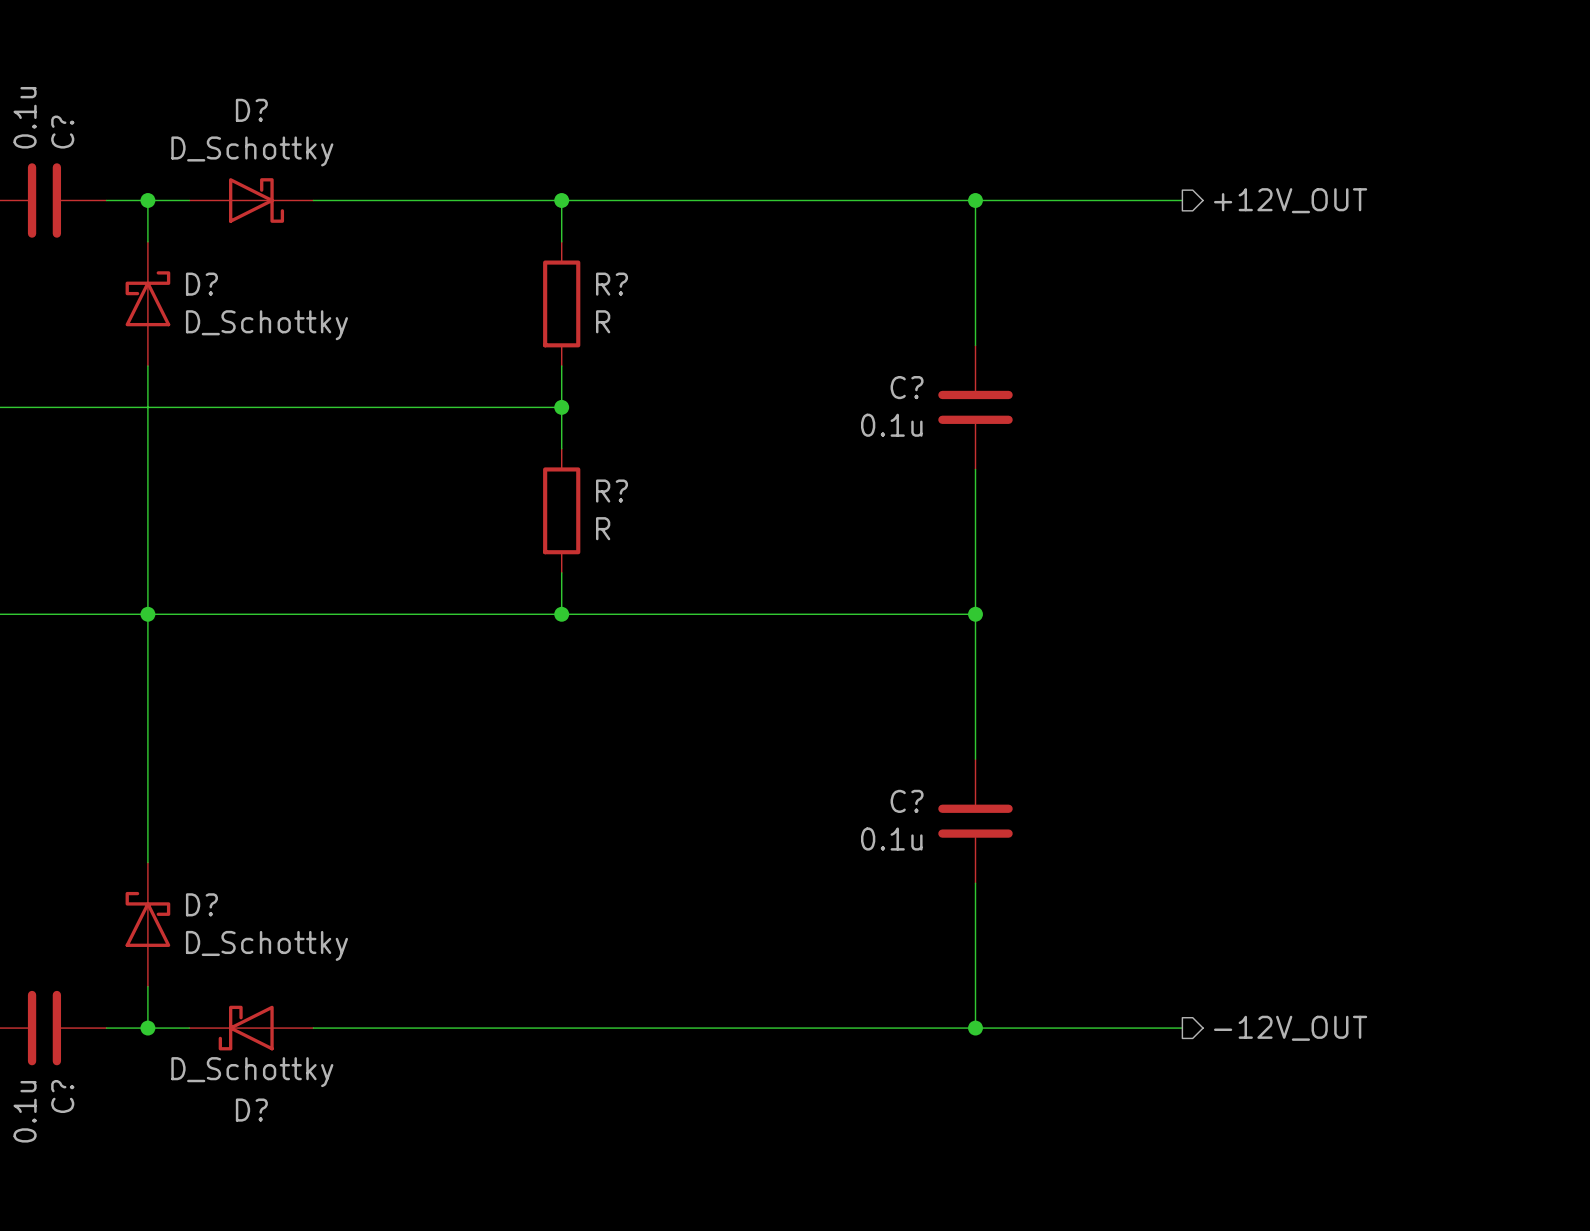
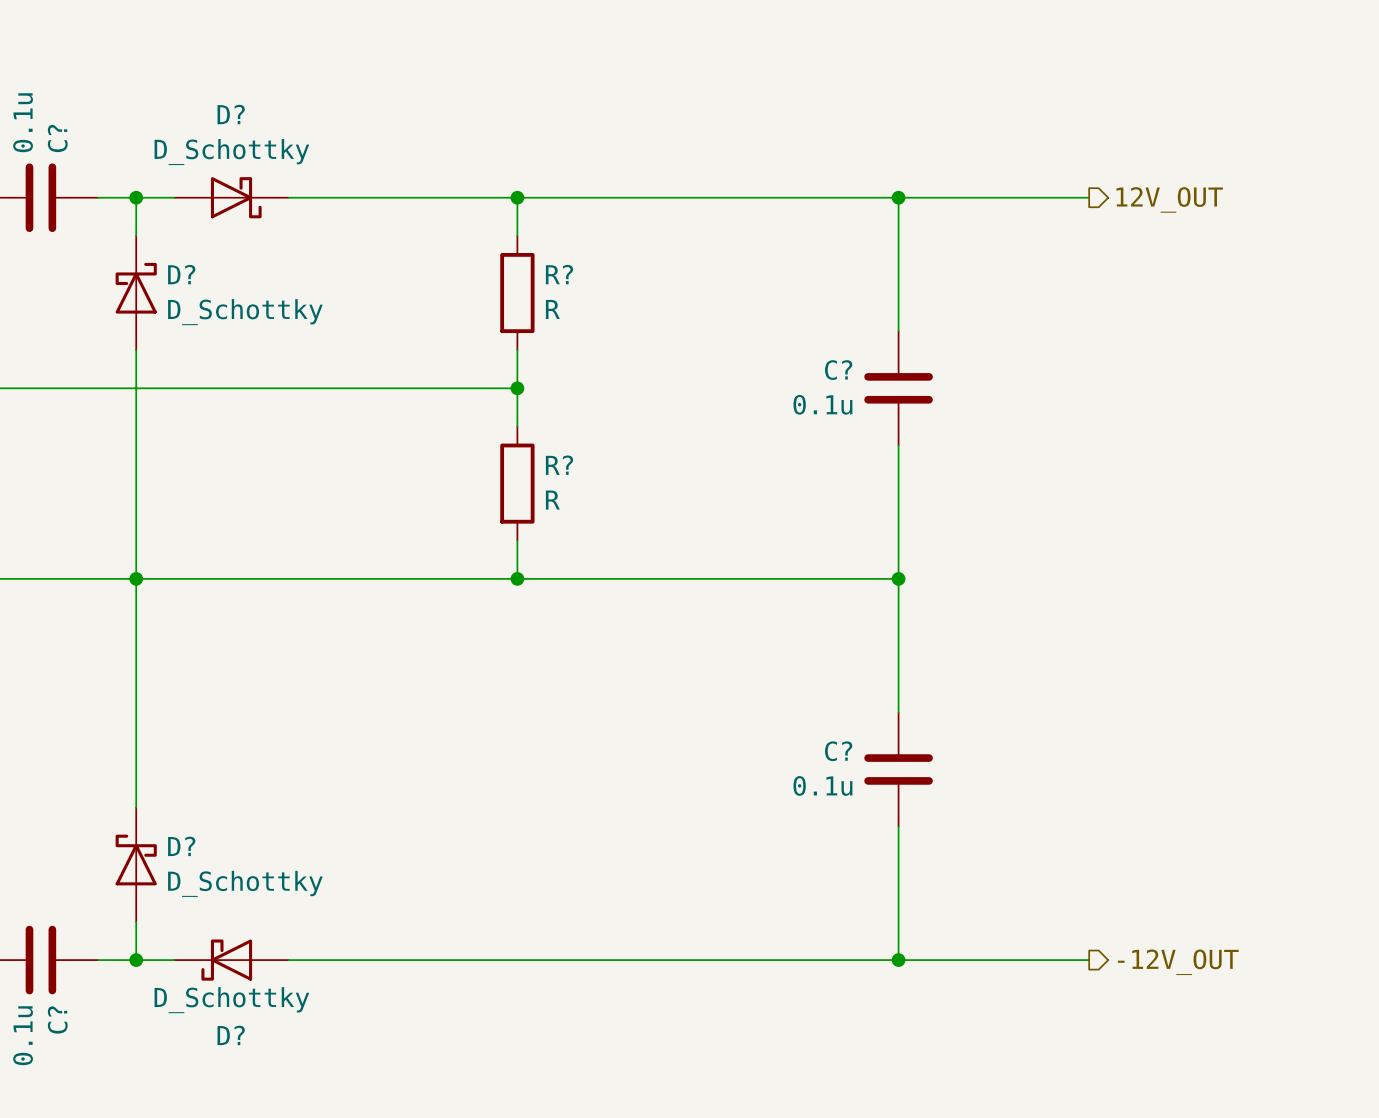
hierarchical label: +12V_OUT (1290, 200) -> 12V_OUT (1169, 199)

